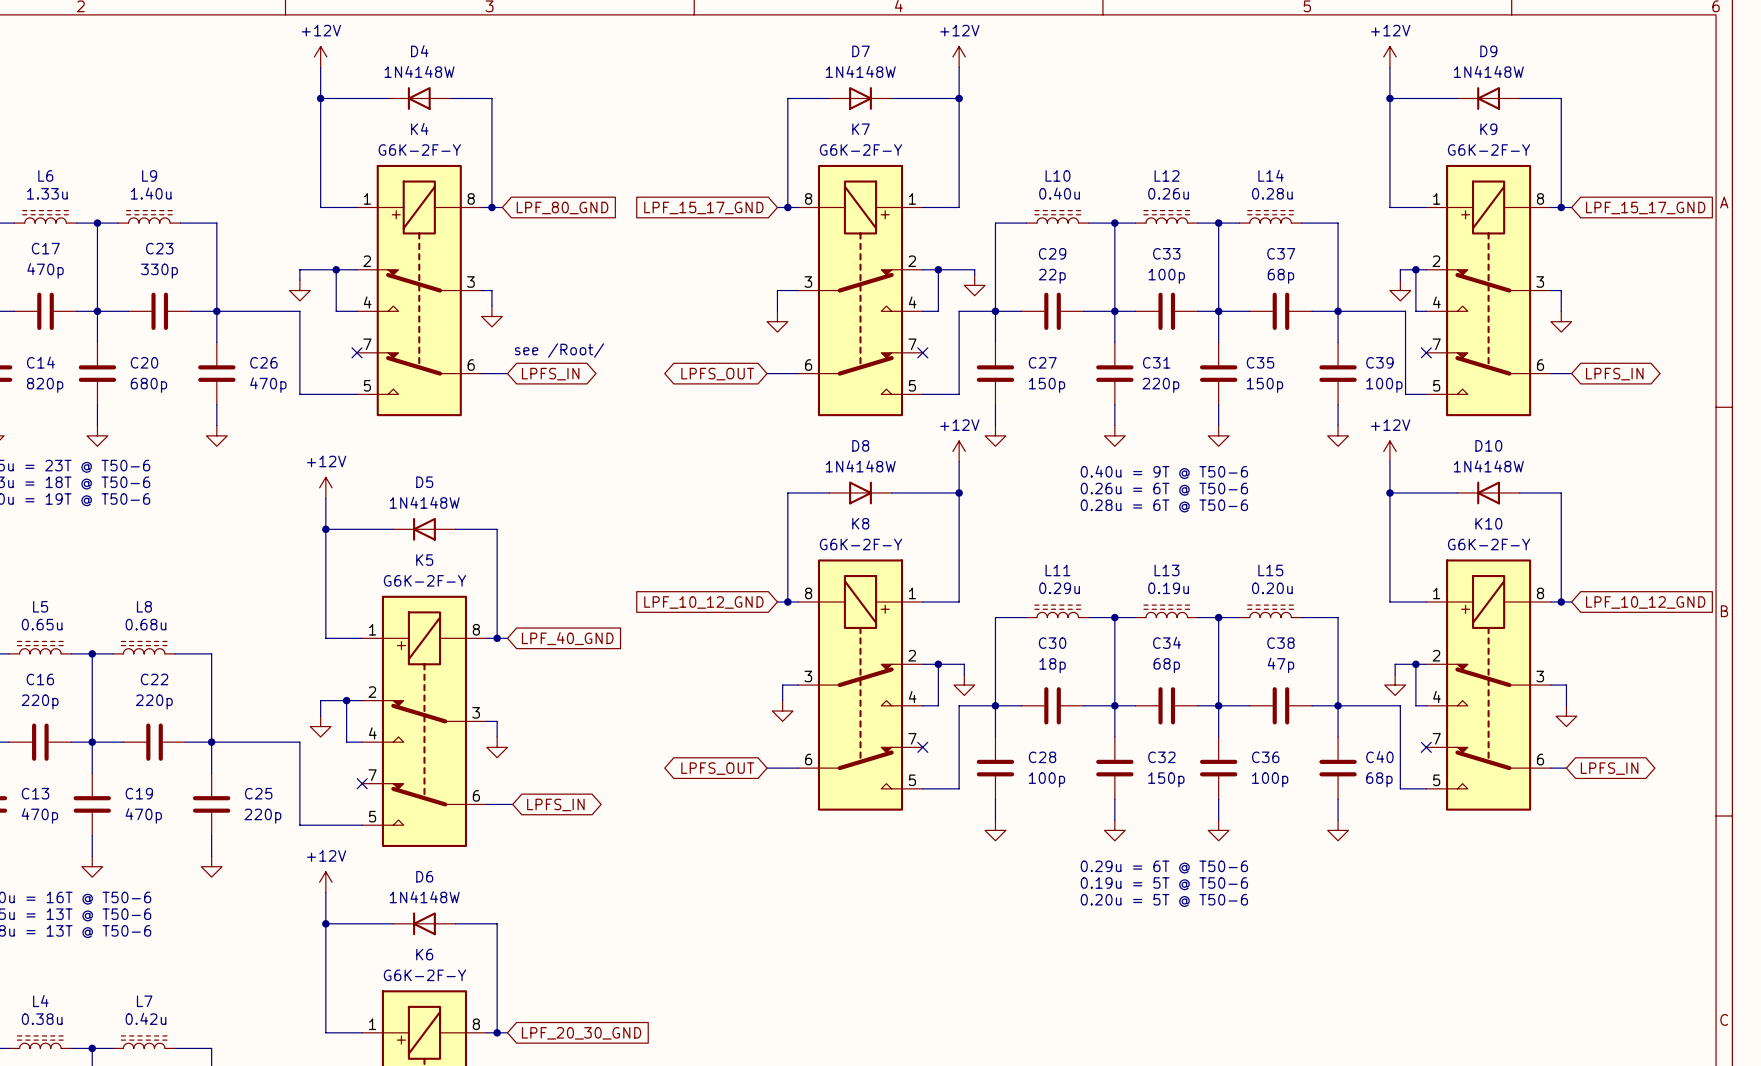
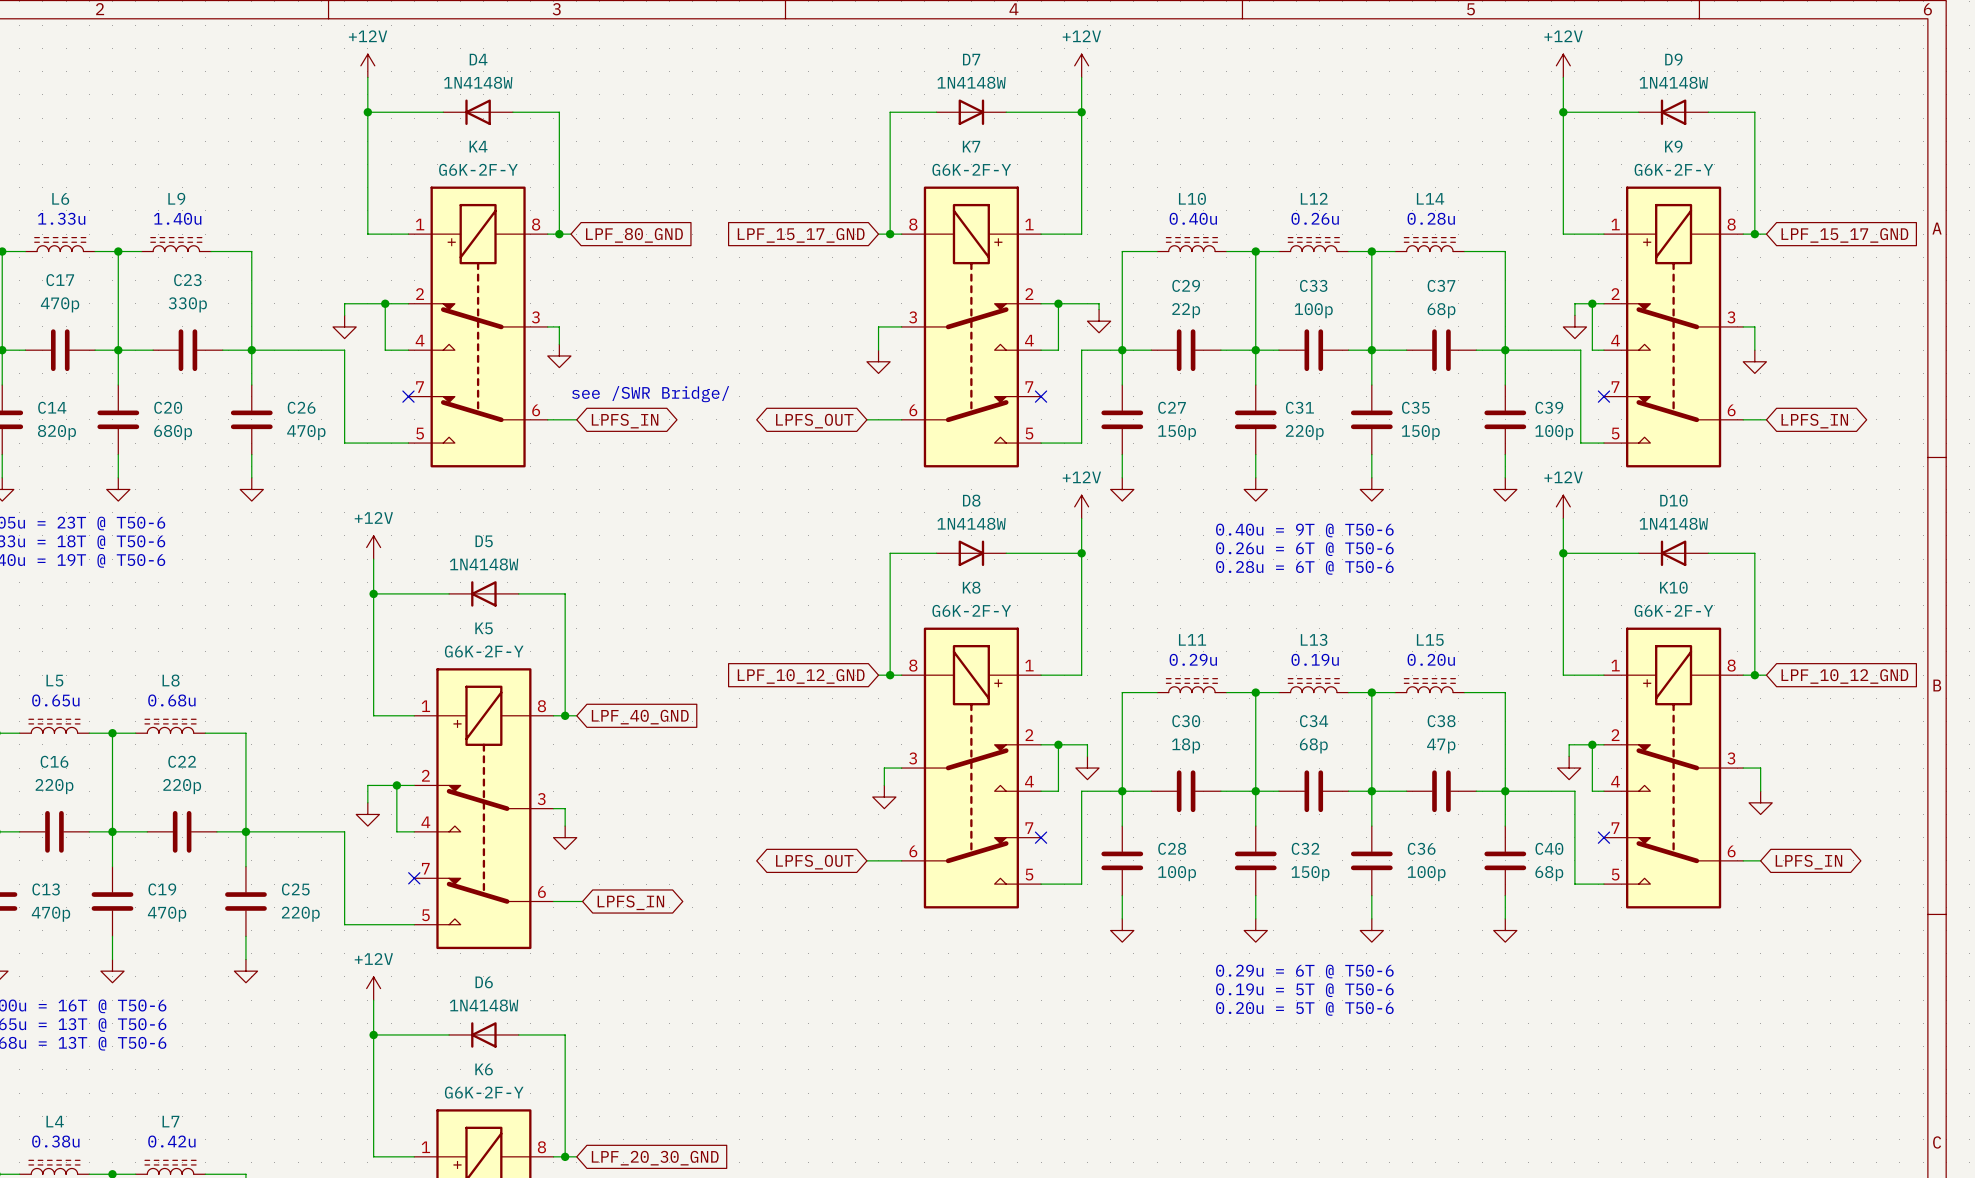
text: see /Root/ (559, 350) -> none
text: none -> see /SWR Bridge/ (650, 394)

